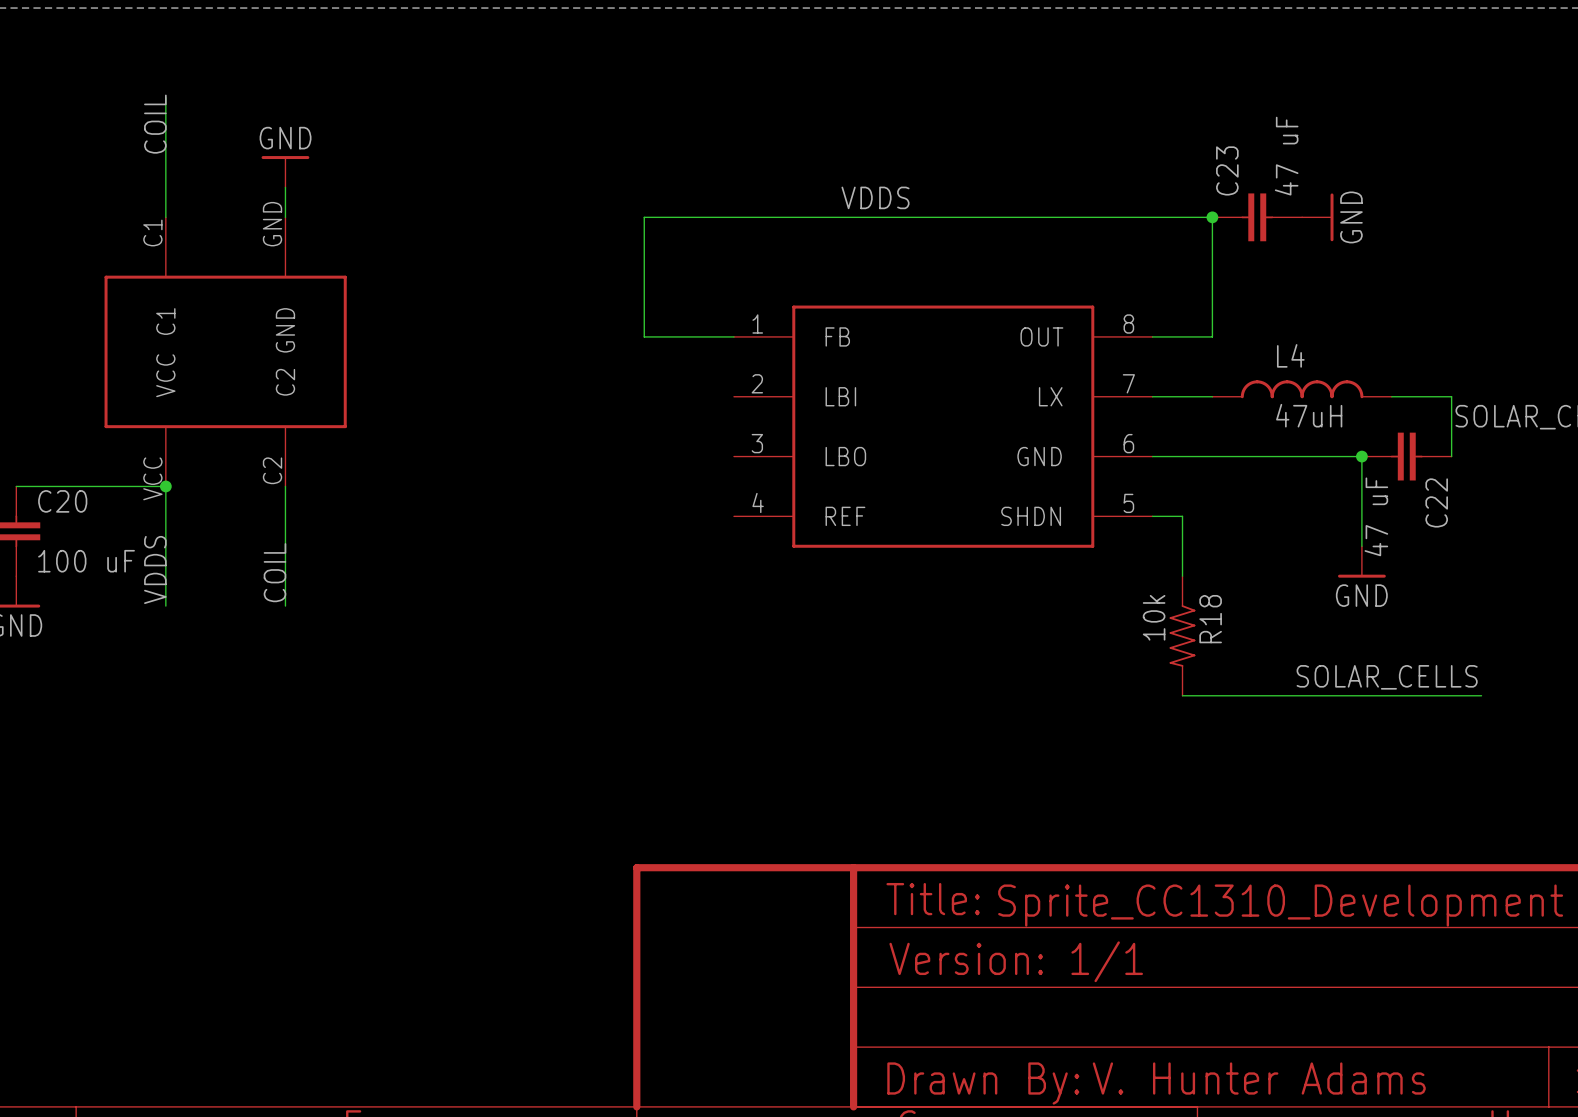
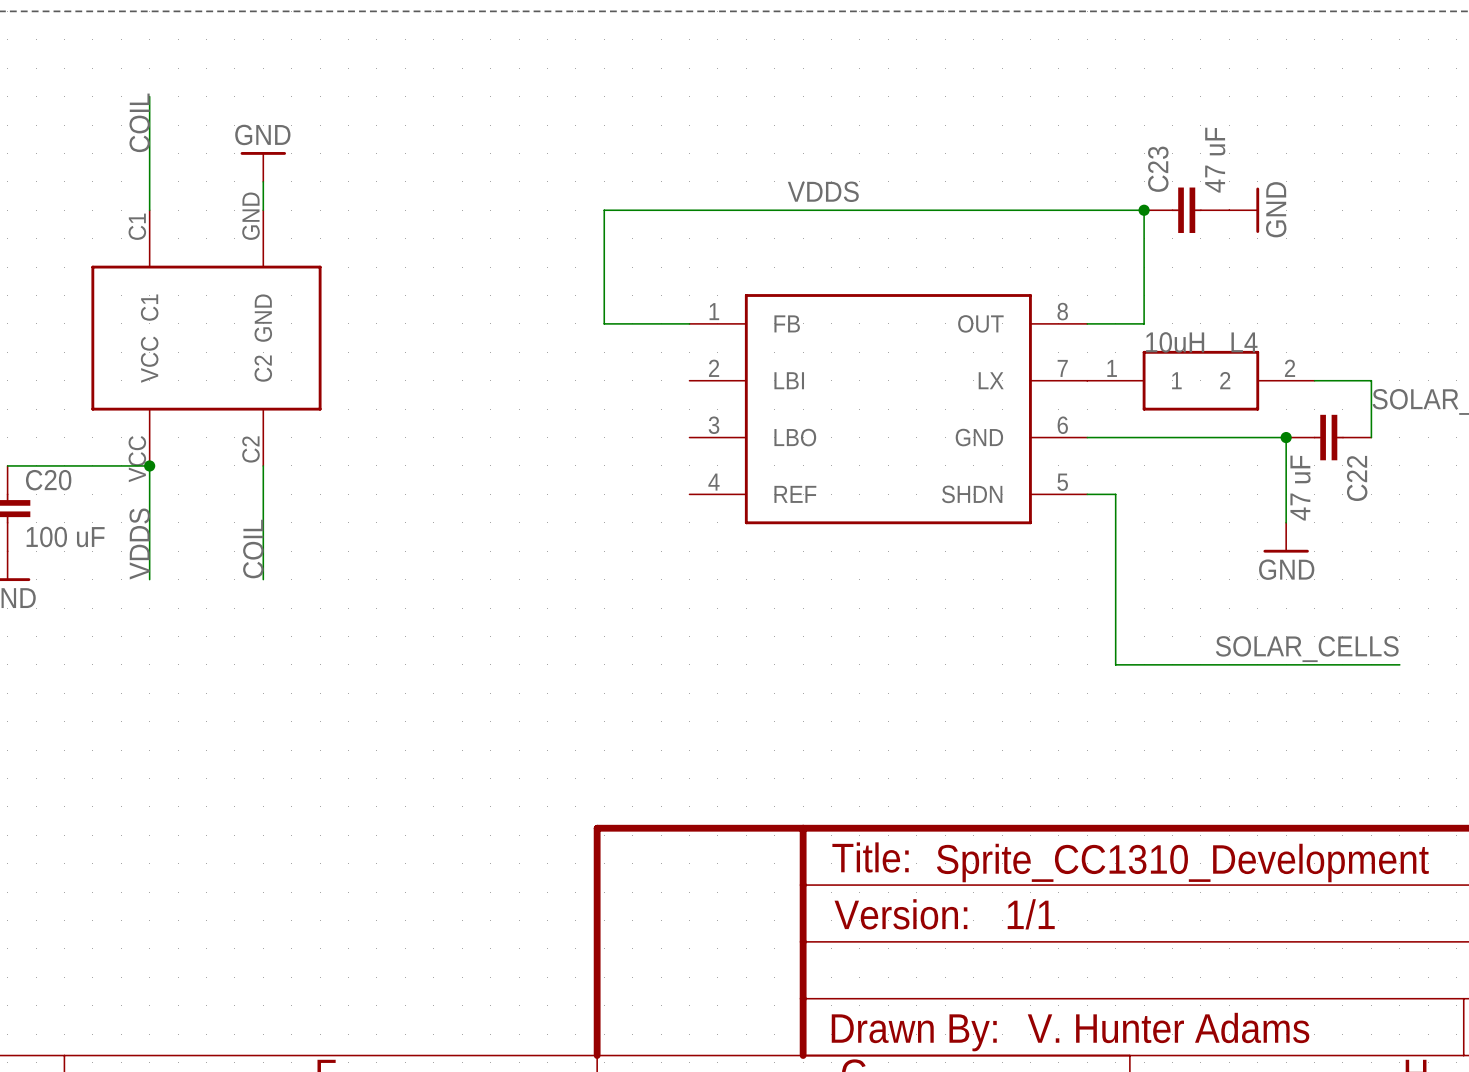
L4 name position: L4 (1290, 355) -> L4 (1244, 342)
L4 symbol: [1212, 380, 1392, 399] -> [1087, 350, 1315, 411]
L4 value: 47uH (1309, 415) -> 10uH (1175, 342)
R18: 10k (1182, 635) -> none

